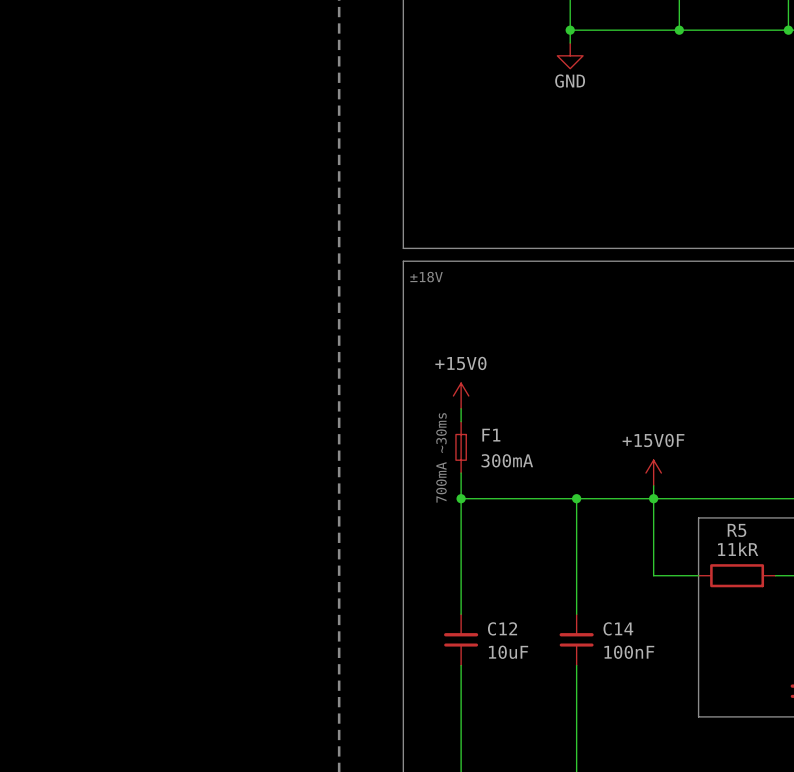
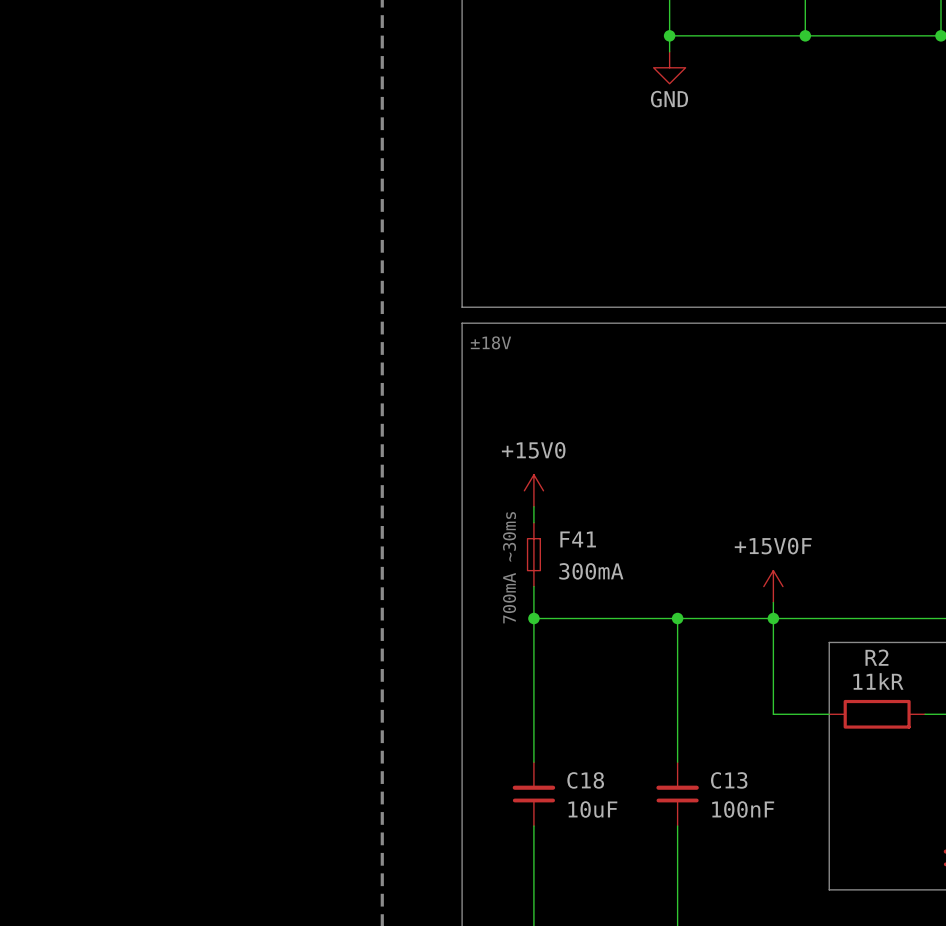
F1 name: F1 (491, 435) -> F41 (578, 539)
R5 name: R5 (737, 530) -> R2 (876, 657)
C12 name: C12 (502, 628) -> C18 (585, 780)
C14 name: C14 (618, 628) -> C13 (729, 780)

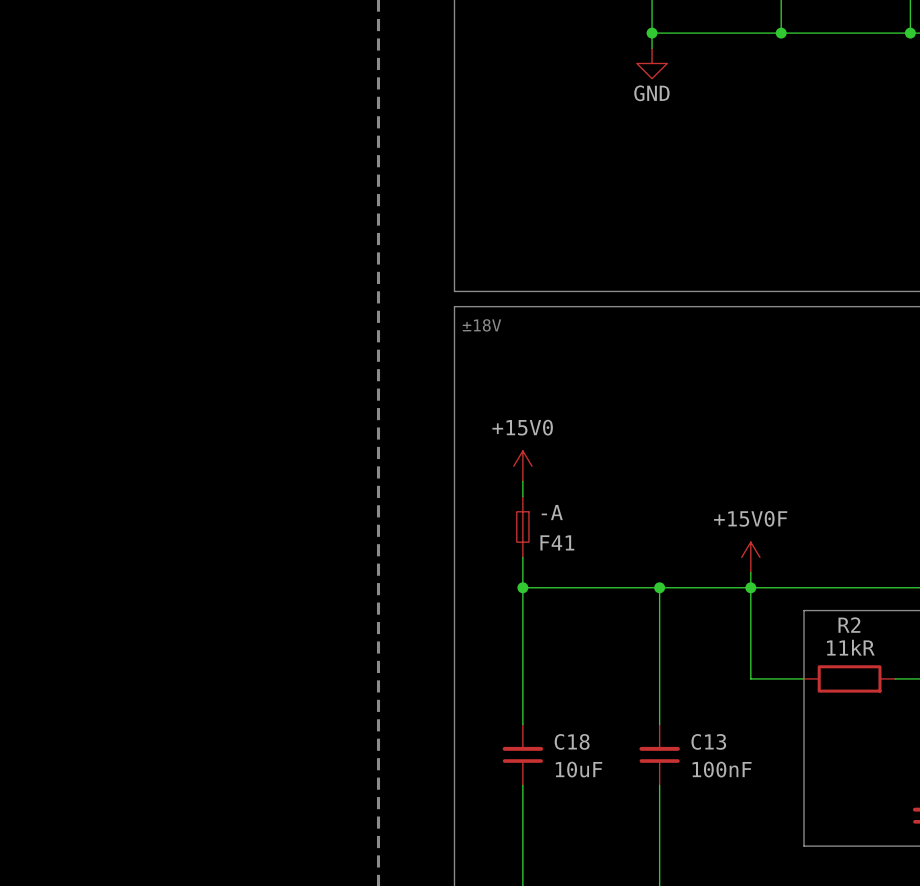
F41 name position: F41 (578, 539) -> F41 (557, 542)
text: 700mA ~30ms (509, 567) -> none
F41 value: 300mA (591, 571) -> -A (552, 512)

